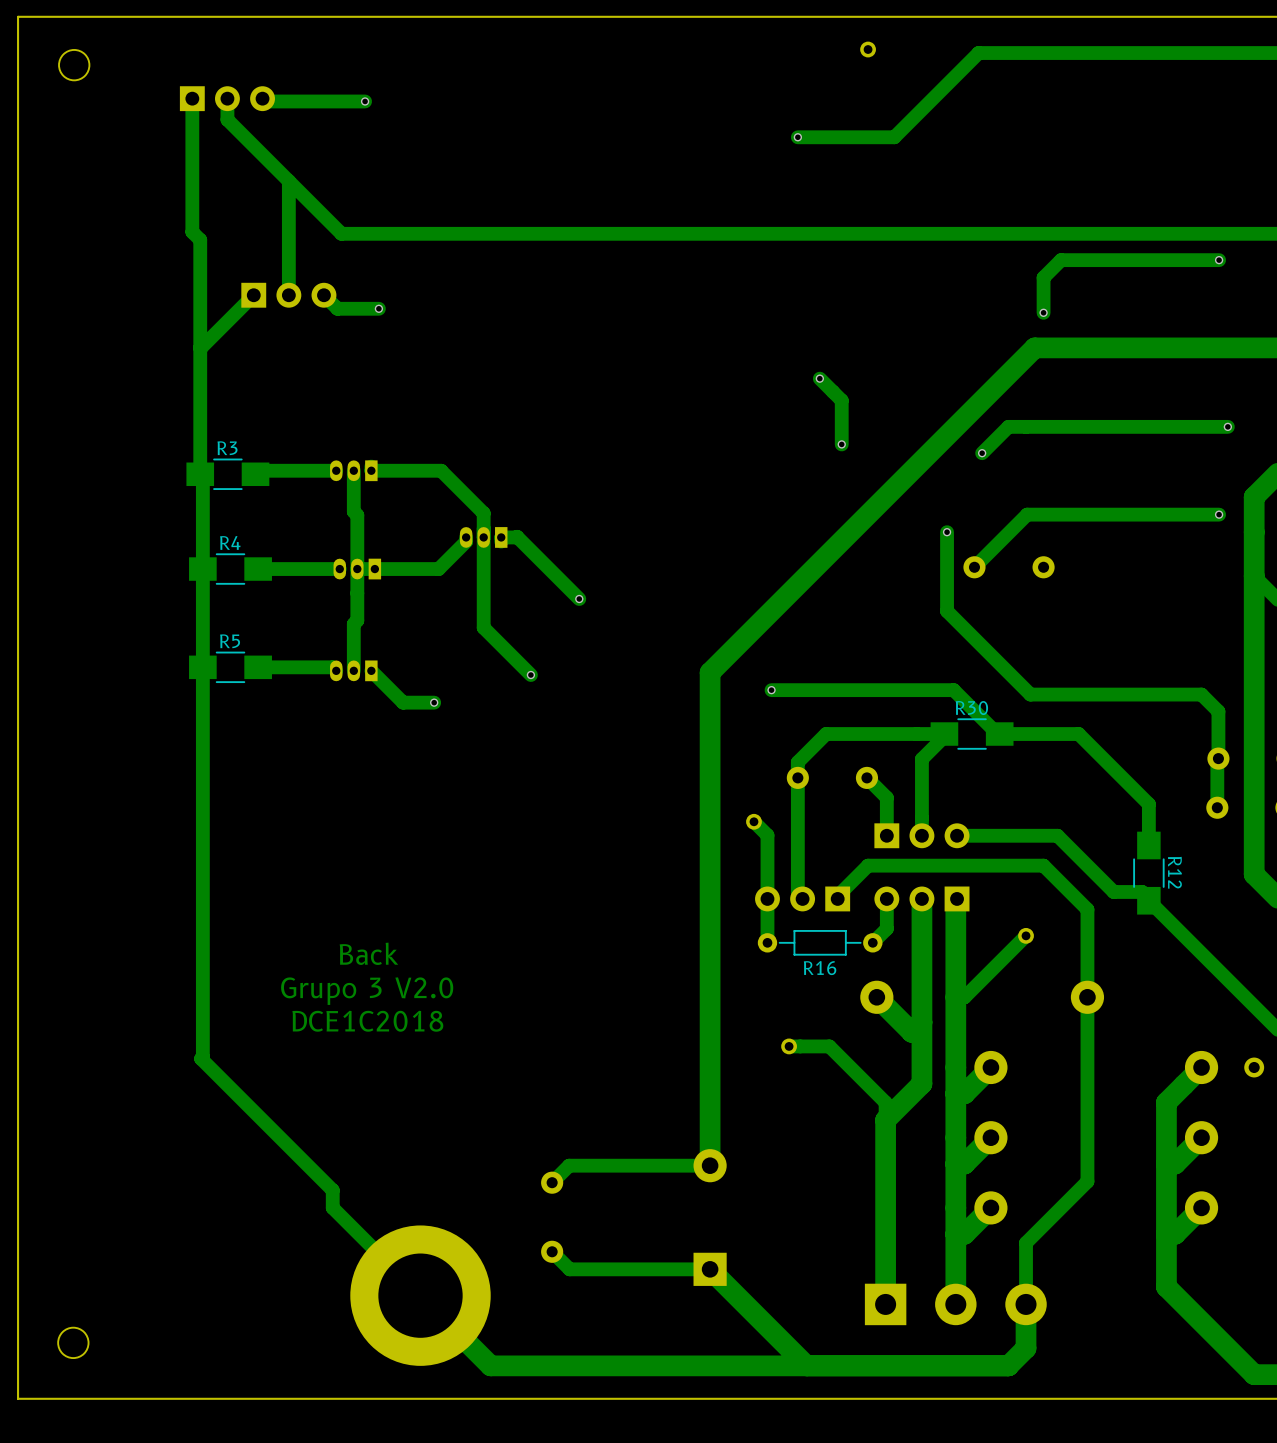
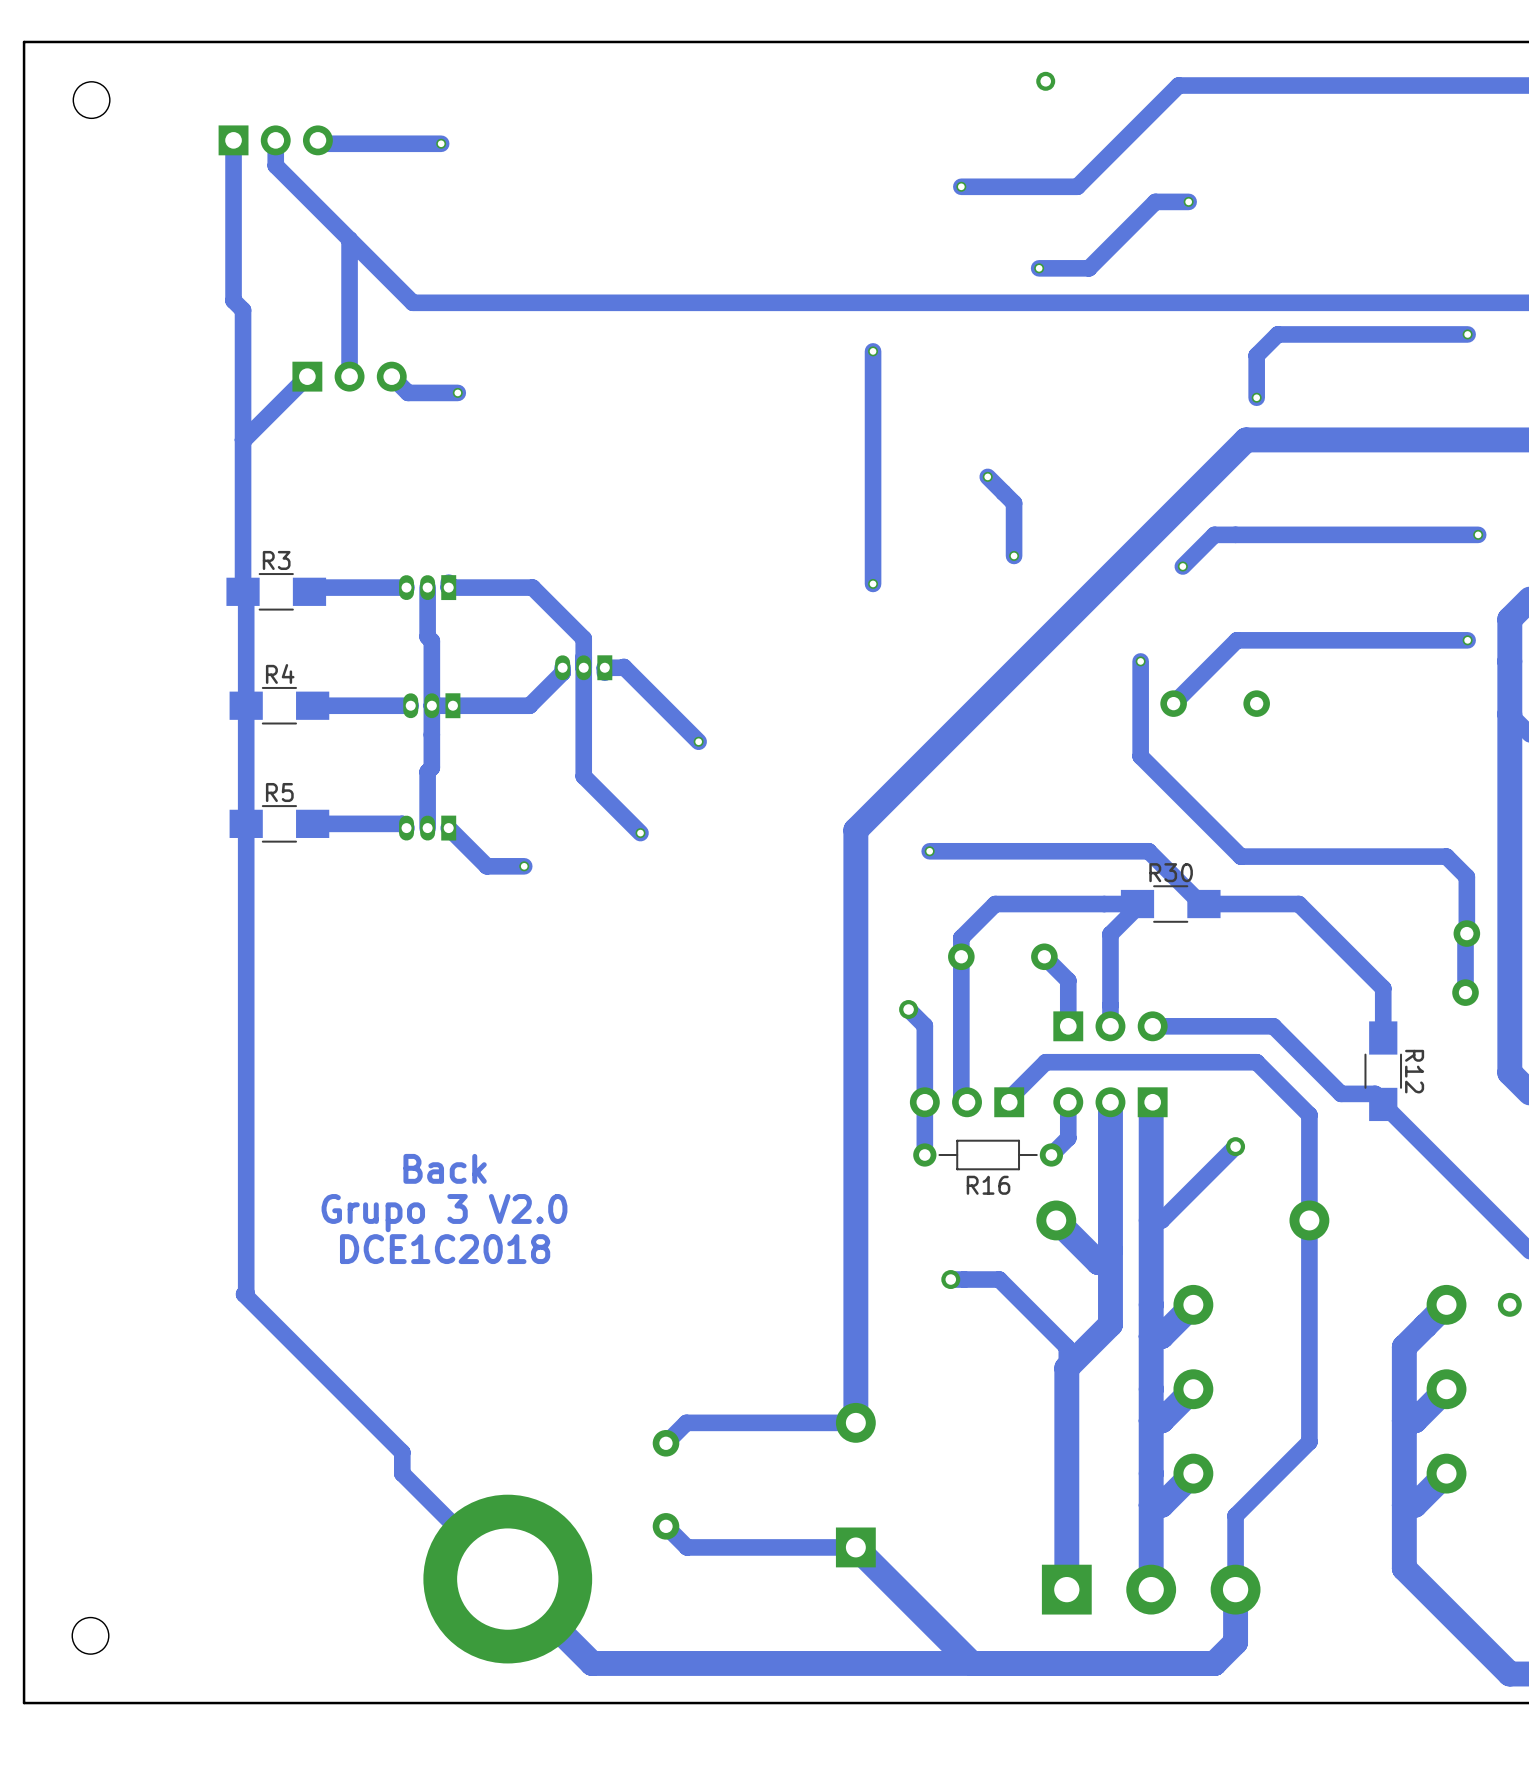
track: none -> (1188, 201) (1155, 201) (1088, 268) (1039, 268)
via: none -> (1188, 201)
via: none -> (1039, 268)
track: none -> (873, 351) (873, 583)
via: none -> (873, 351)
via: none -> (873, 583)

